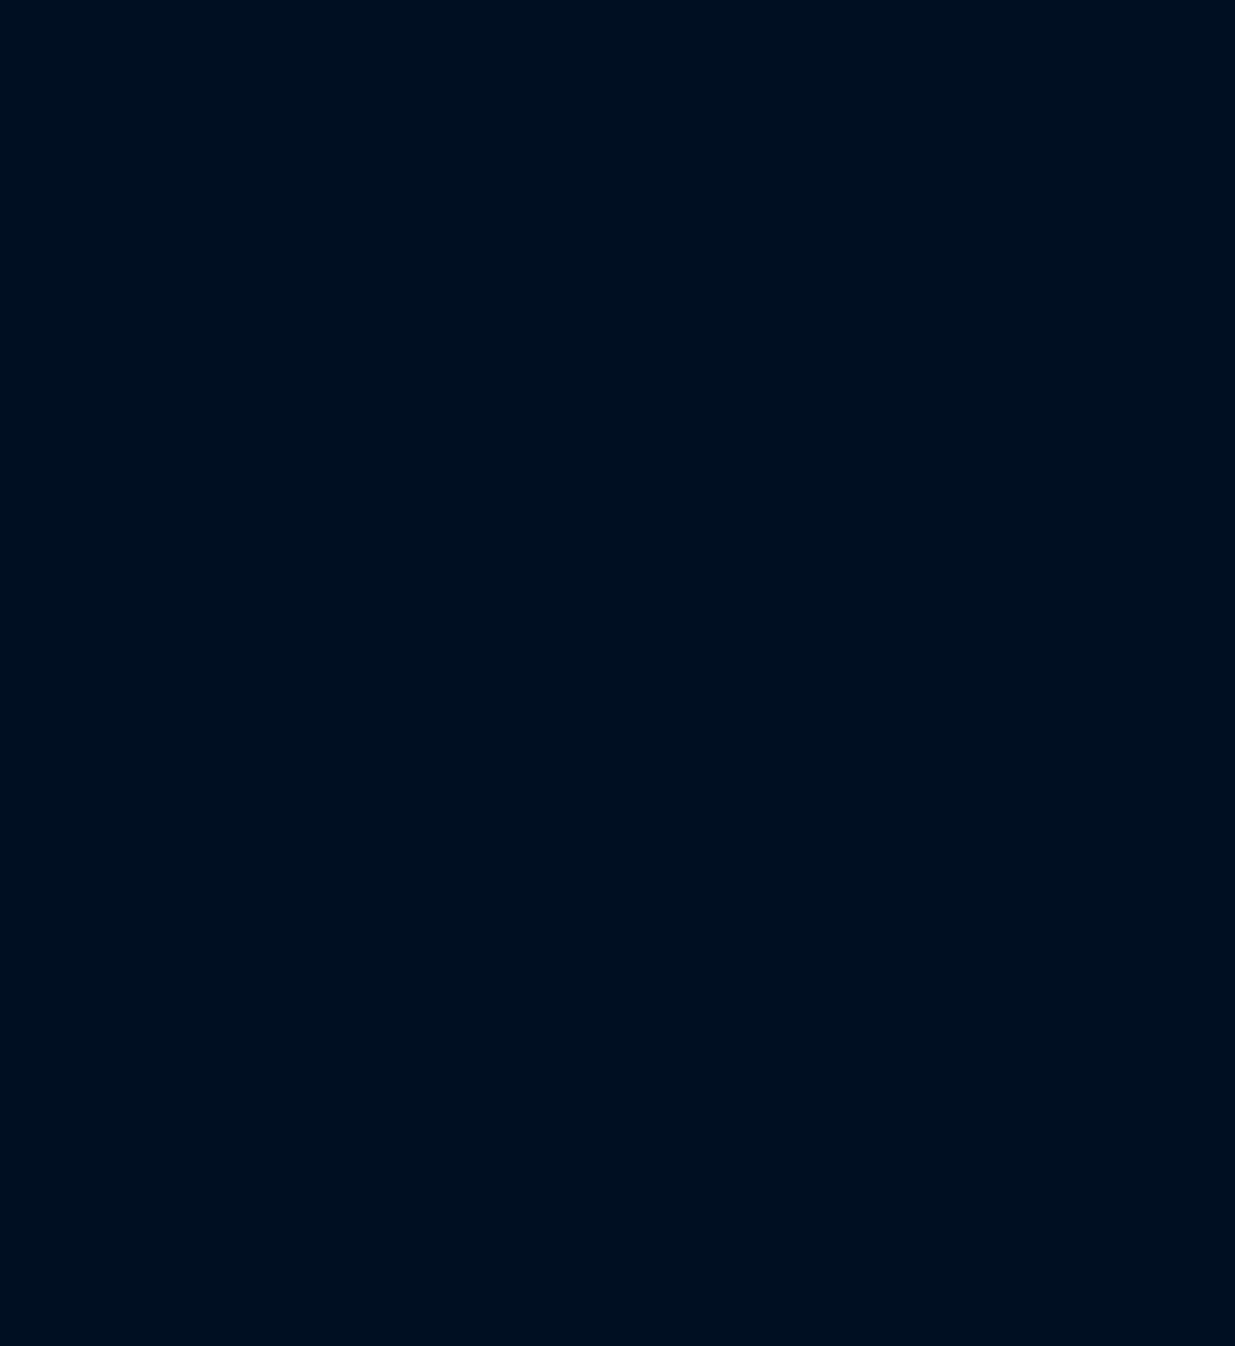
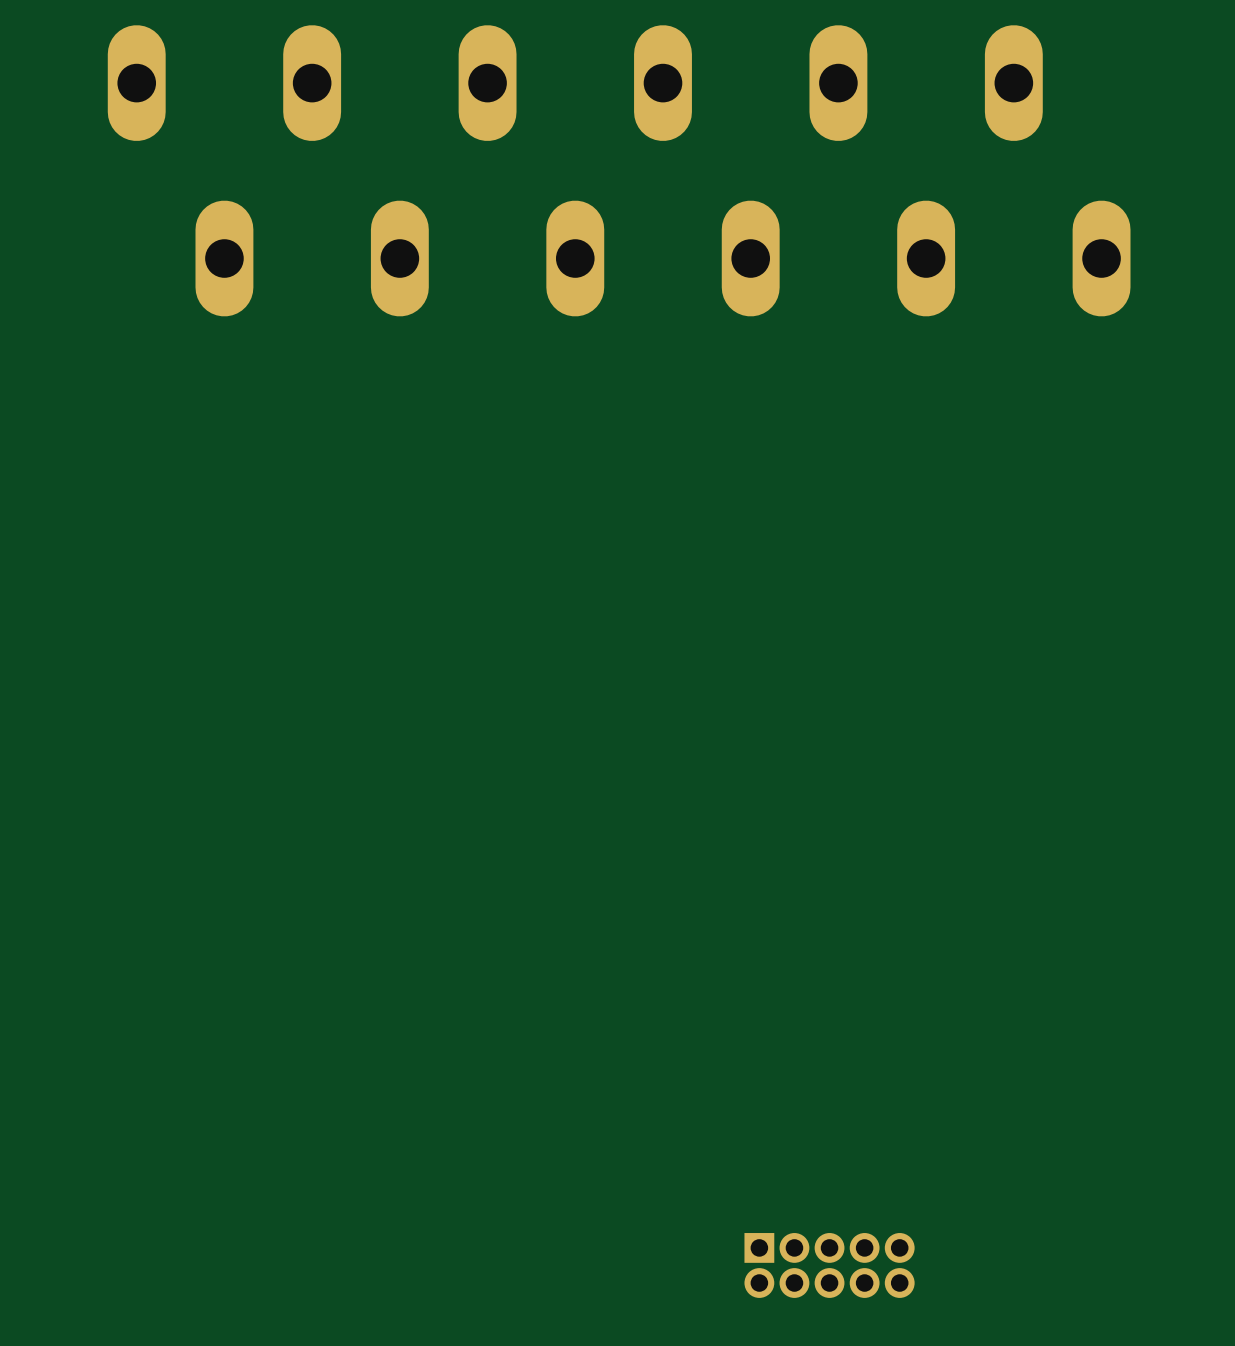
part: none -> (619, 170)
part: none -> (829, 1265)

